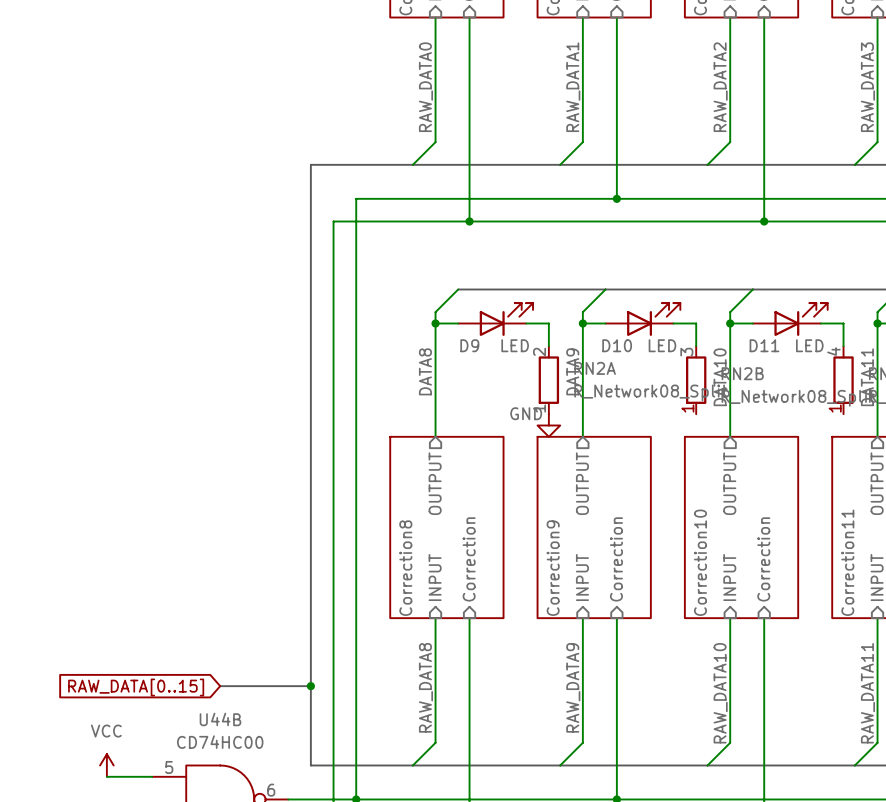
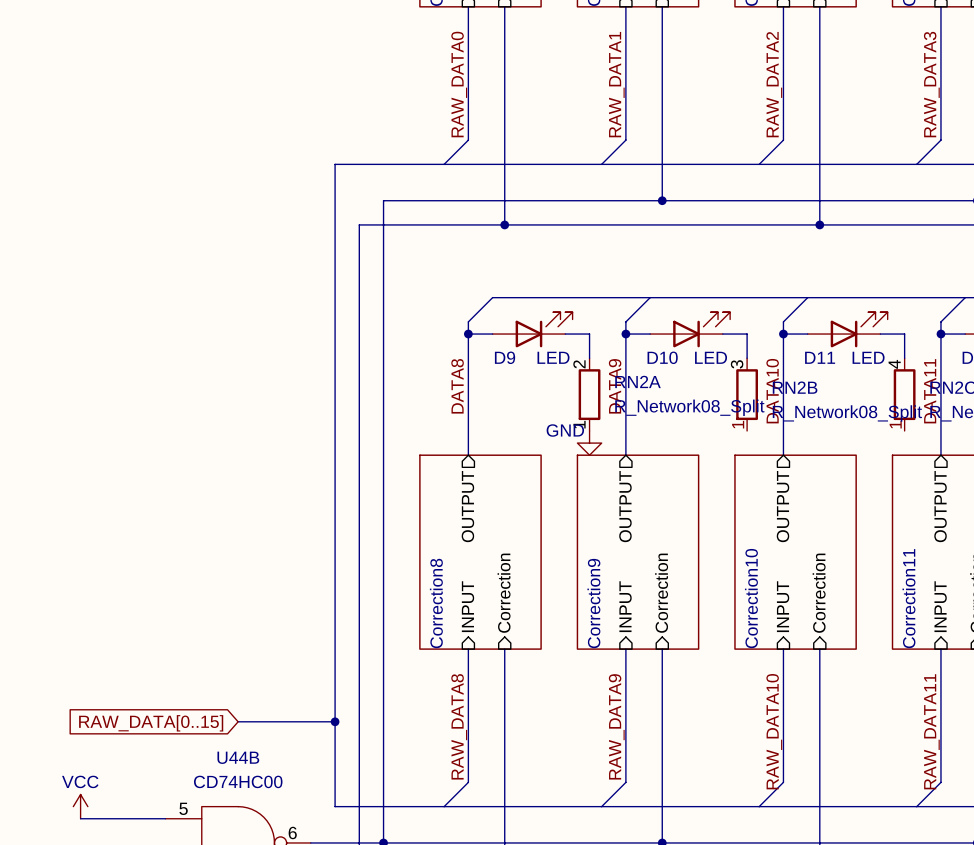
power symbol text position: VCC (106, 731) -> VCC (80, 781)
power symbol position: VCC (106, 765) -> VCC (80, 806)
wire: none -> (80, 818) (116, 818)

